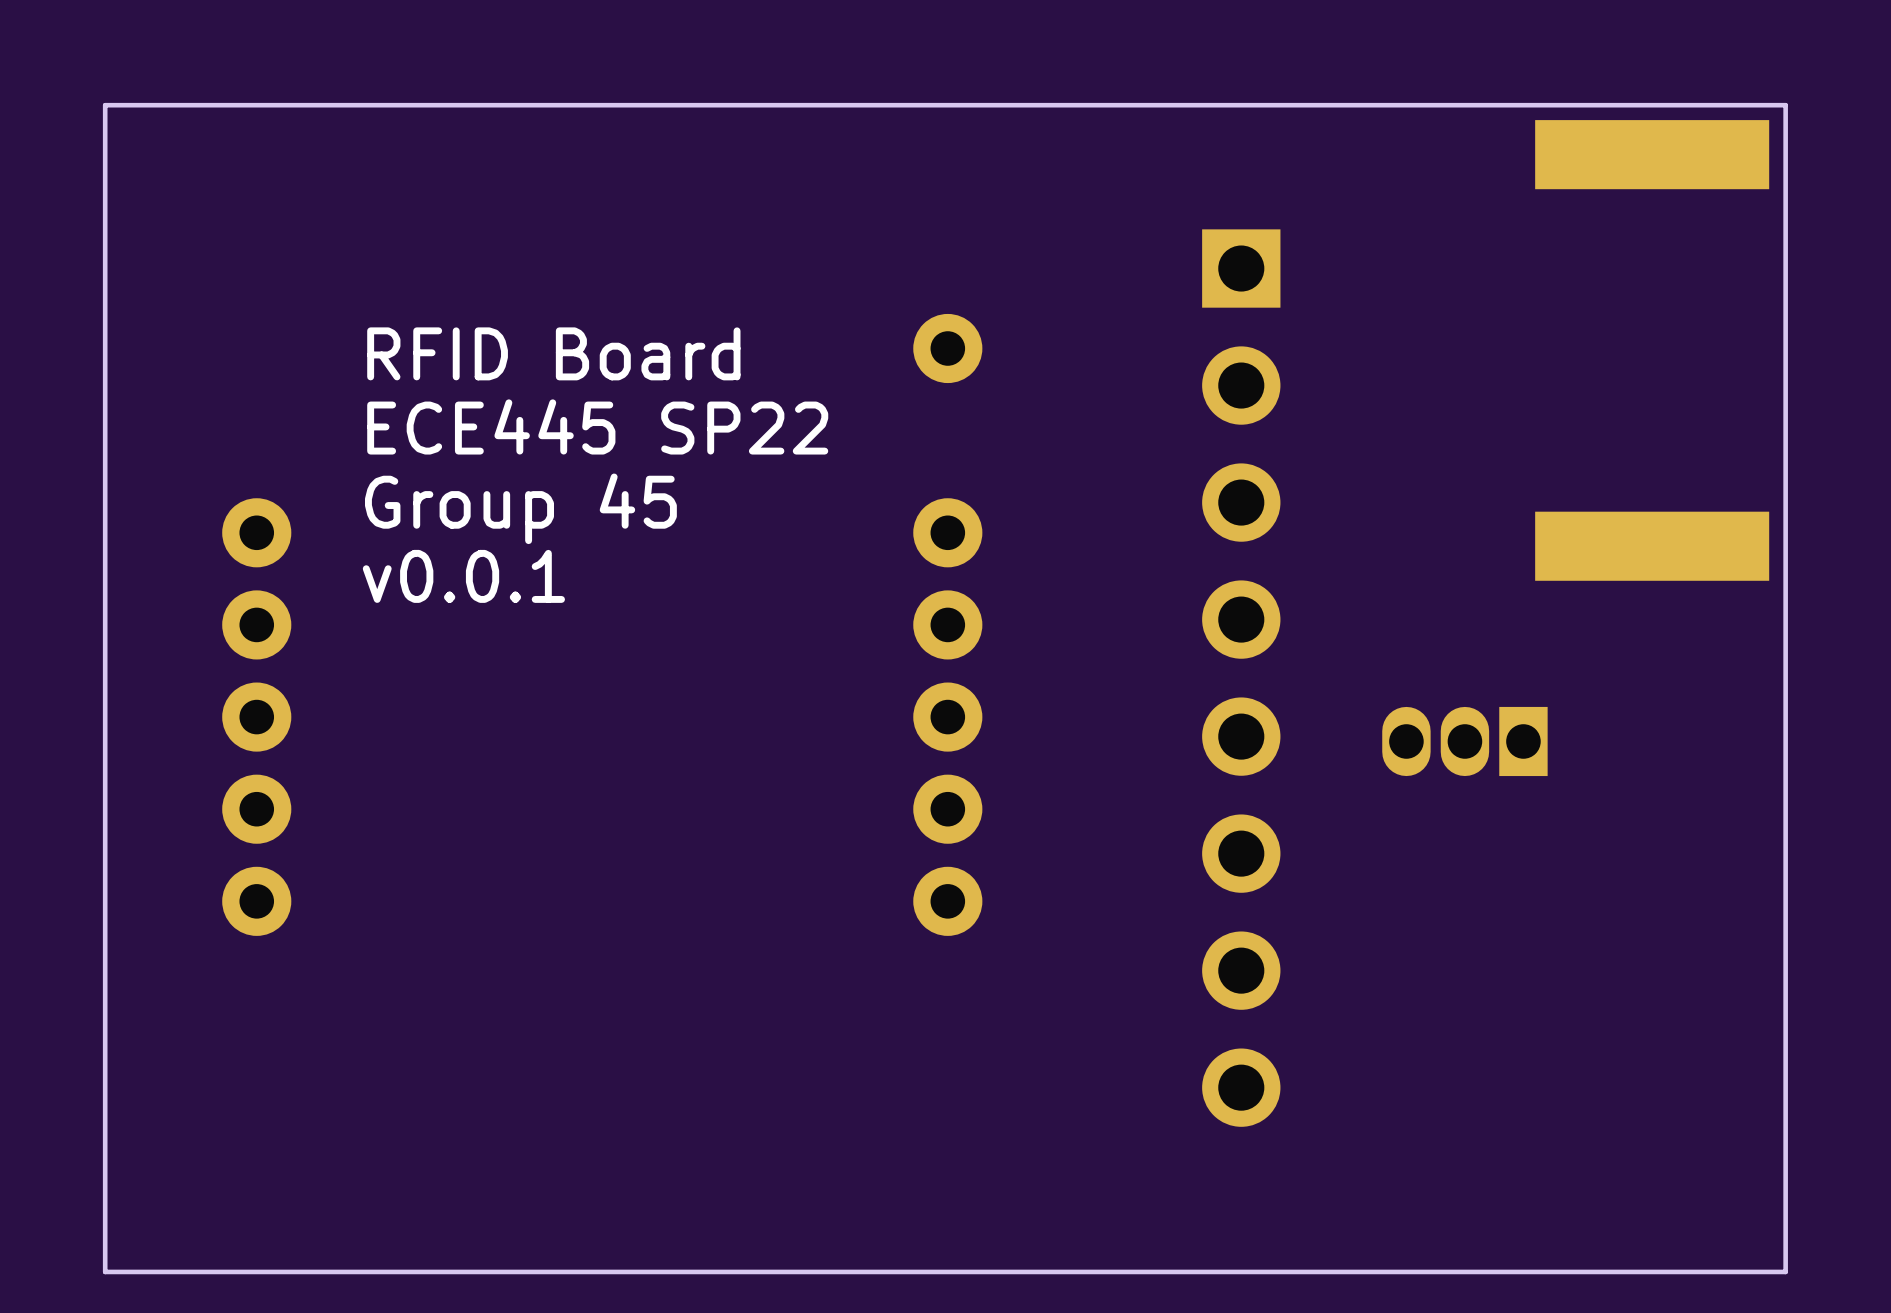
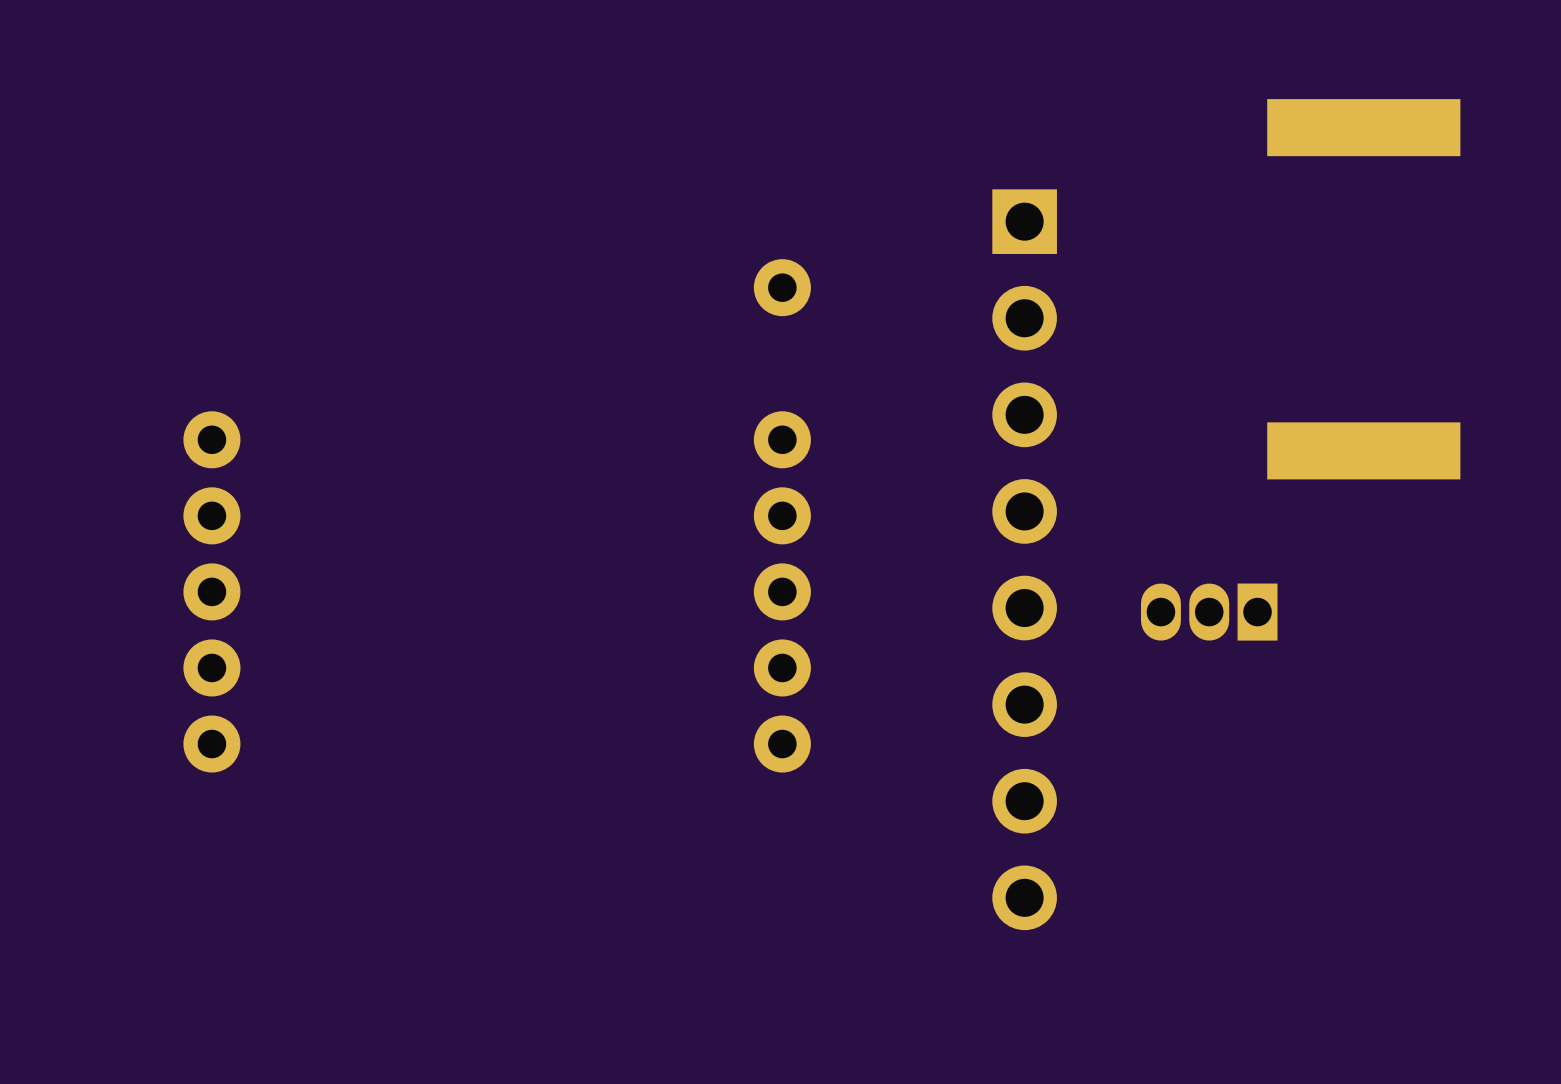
board edge: (1785, 105) (105, 105) (105, 1271) (1785, 1271) (1785, 105) -> none
text: RFID Board (553, 353) -> none
text: ECE445 SP22 (597, 426) -> none
text: Group 45 (520, 508) -> none
text: v0.0.1 (463, 576) -> none

